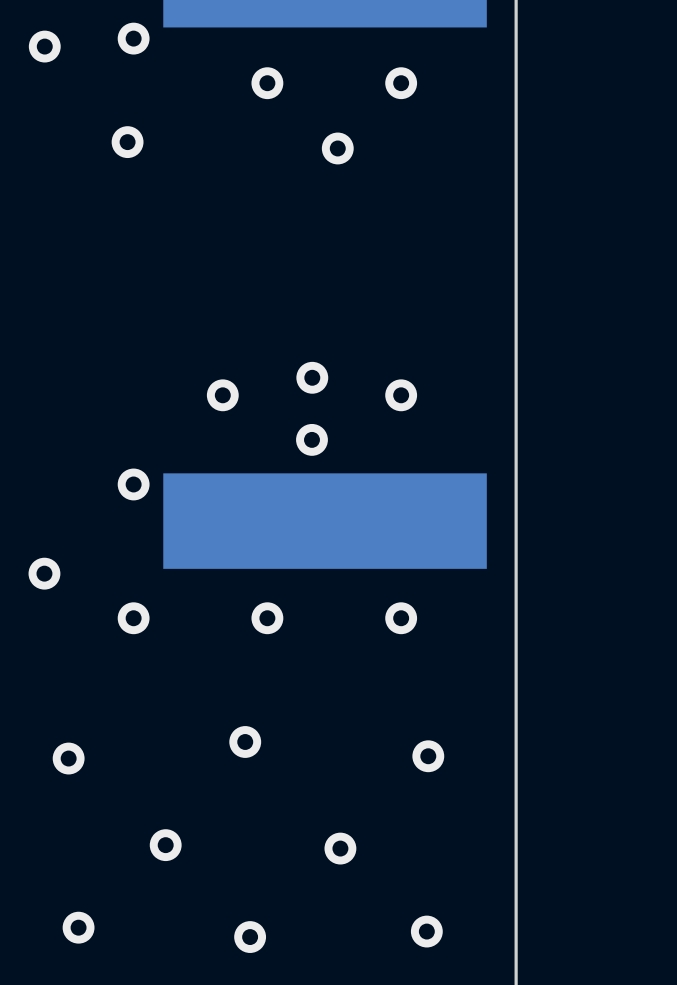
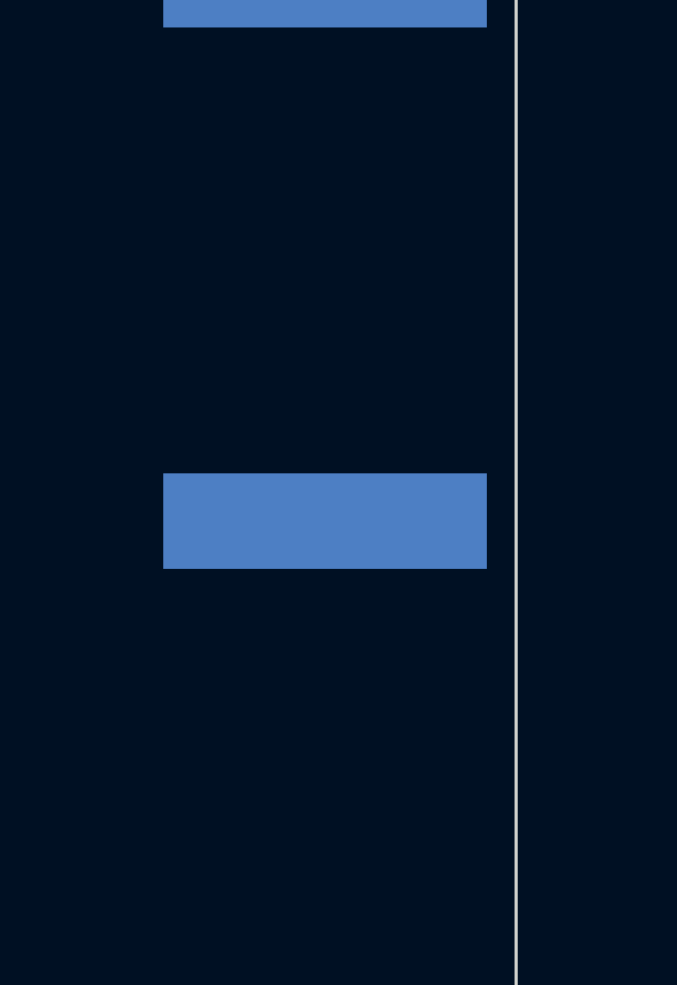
via: (133, 38) -> none
via: (44, 46) -> none
via: (267, 83) -> none
via: (401, 83) -> none
via: (127, 142) -> none
via: (337, 148) -> none
via: (312, 377) -> none
via: (222, 395) -> none
via: (401, 395) -> none
via: (311, 439) -> none
via: (133, 484) -> none
via: (44, 573) -> none
via: (133, 618) -> none
via: (267, 618) -> none
via: (401, 618) -> none
via: (245, 741) -> none
via: (428, 756) -> none
via: (68, 758) -> none
via: (165, 845) -> none
via: (340, 848) -> none
via: (78, 927) -> none
via: (426, 931) -> none
via: (250, 937) -> none

